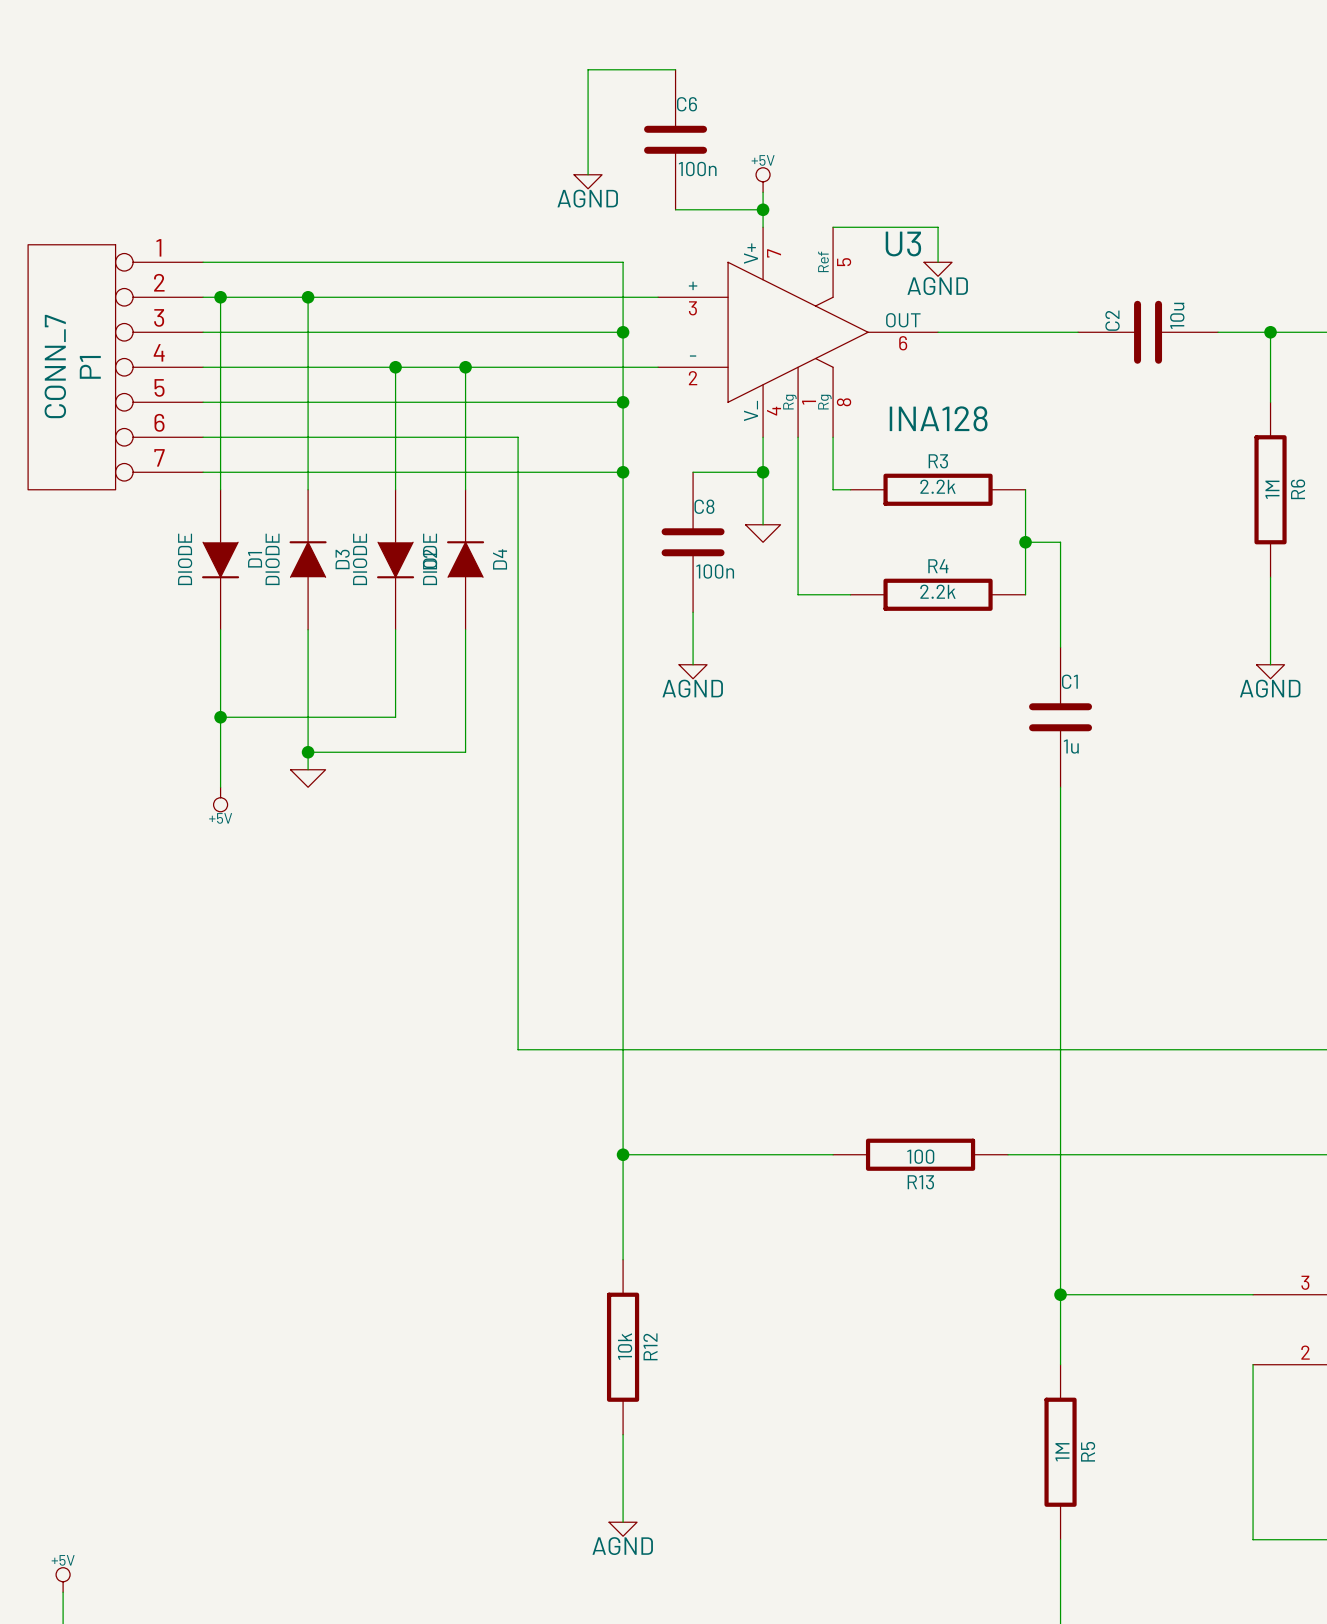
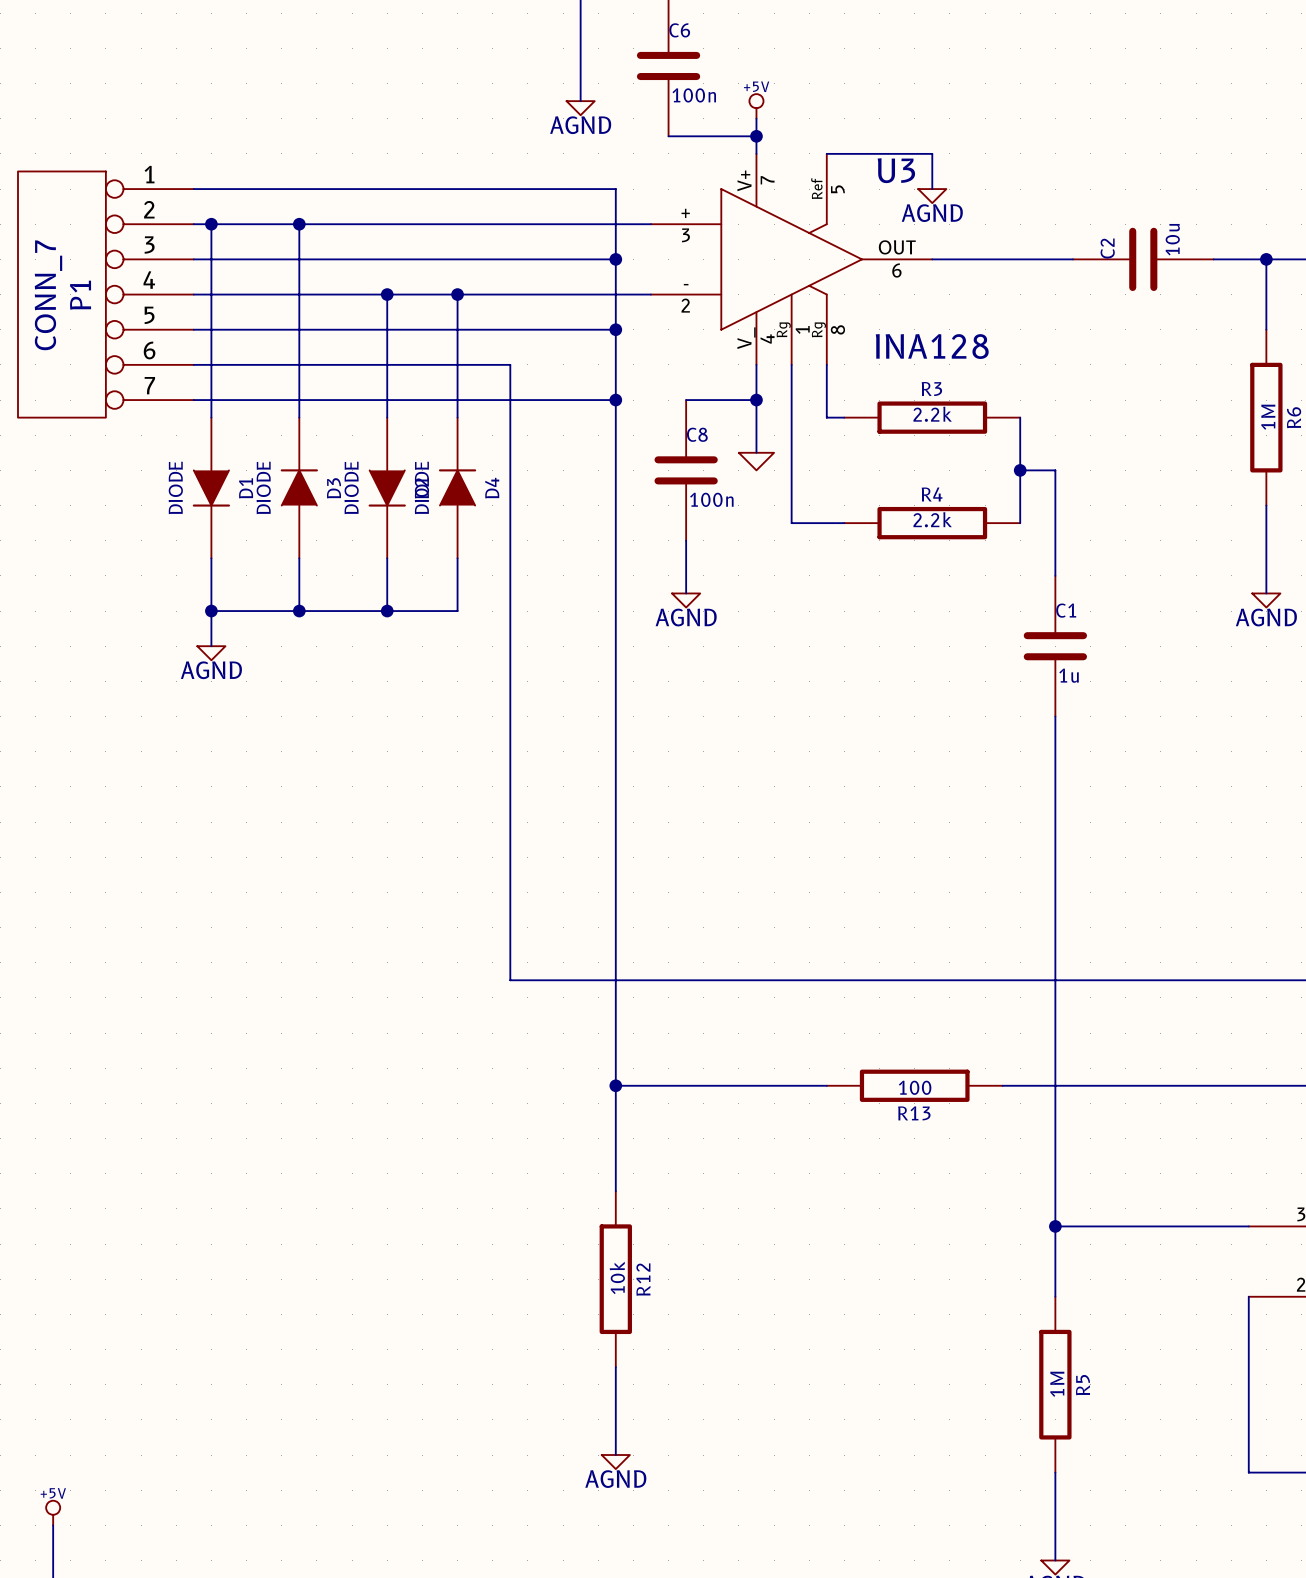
wire: (308, 682) (308, 769) -> none
junction: none -> (299, 611)
wire: (395, 682) (395, 717) (220, 717) (220, 787) -> none
junction: none -> (387, 611)
wire: (465, 682) (465, 752) (308, 752) -> (457, 611) (211, 611)
junction position: (220, 717) -> (211, 611)
power symbol: none -> AGND (211, 653)
junction: (308, 752) -> none
power symbol: (308, 778) -> none
power symbol: +5V (220, 799) -> none

